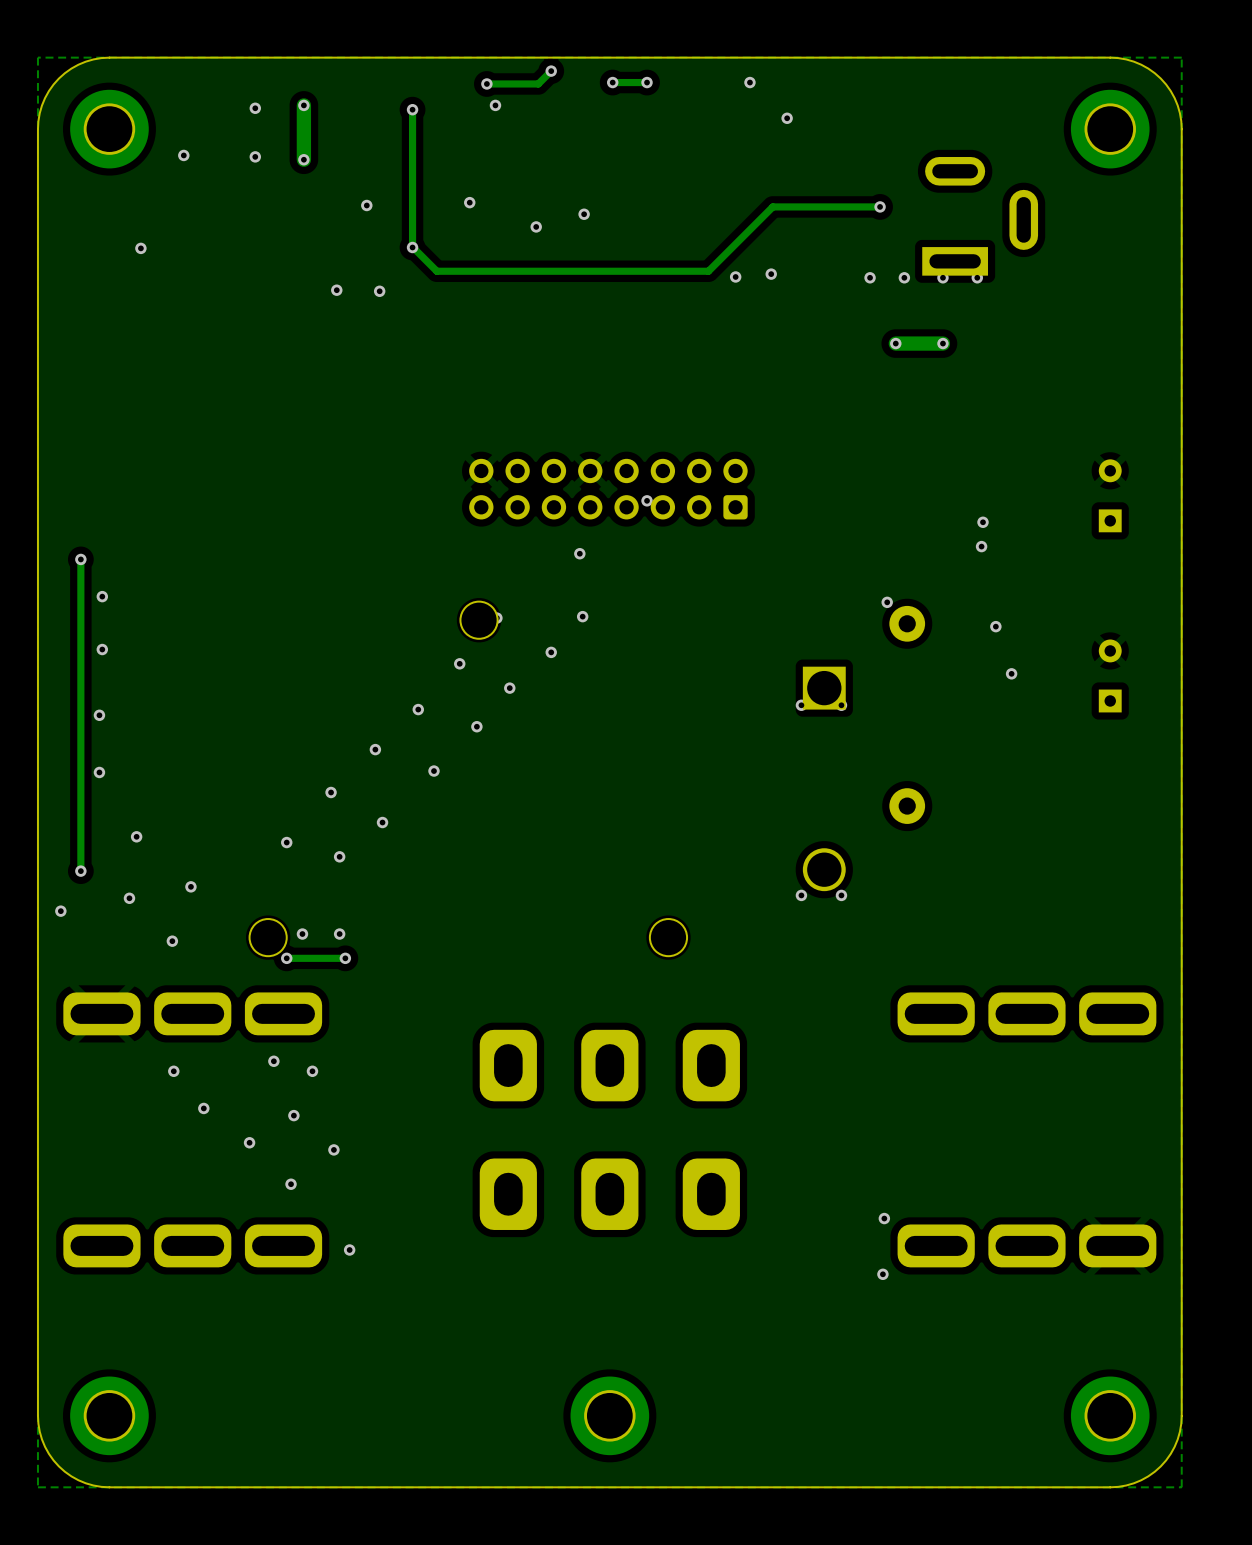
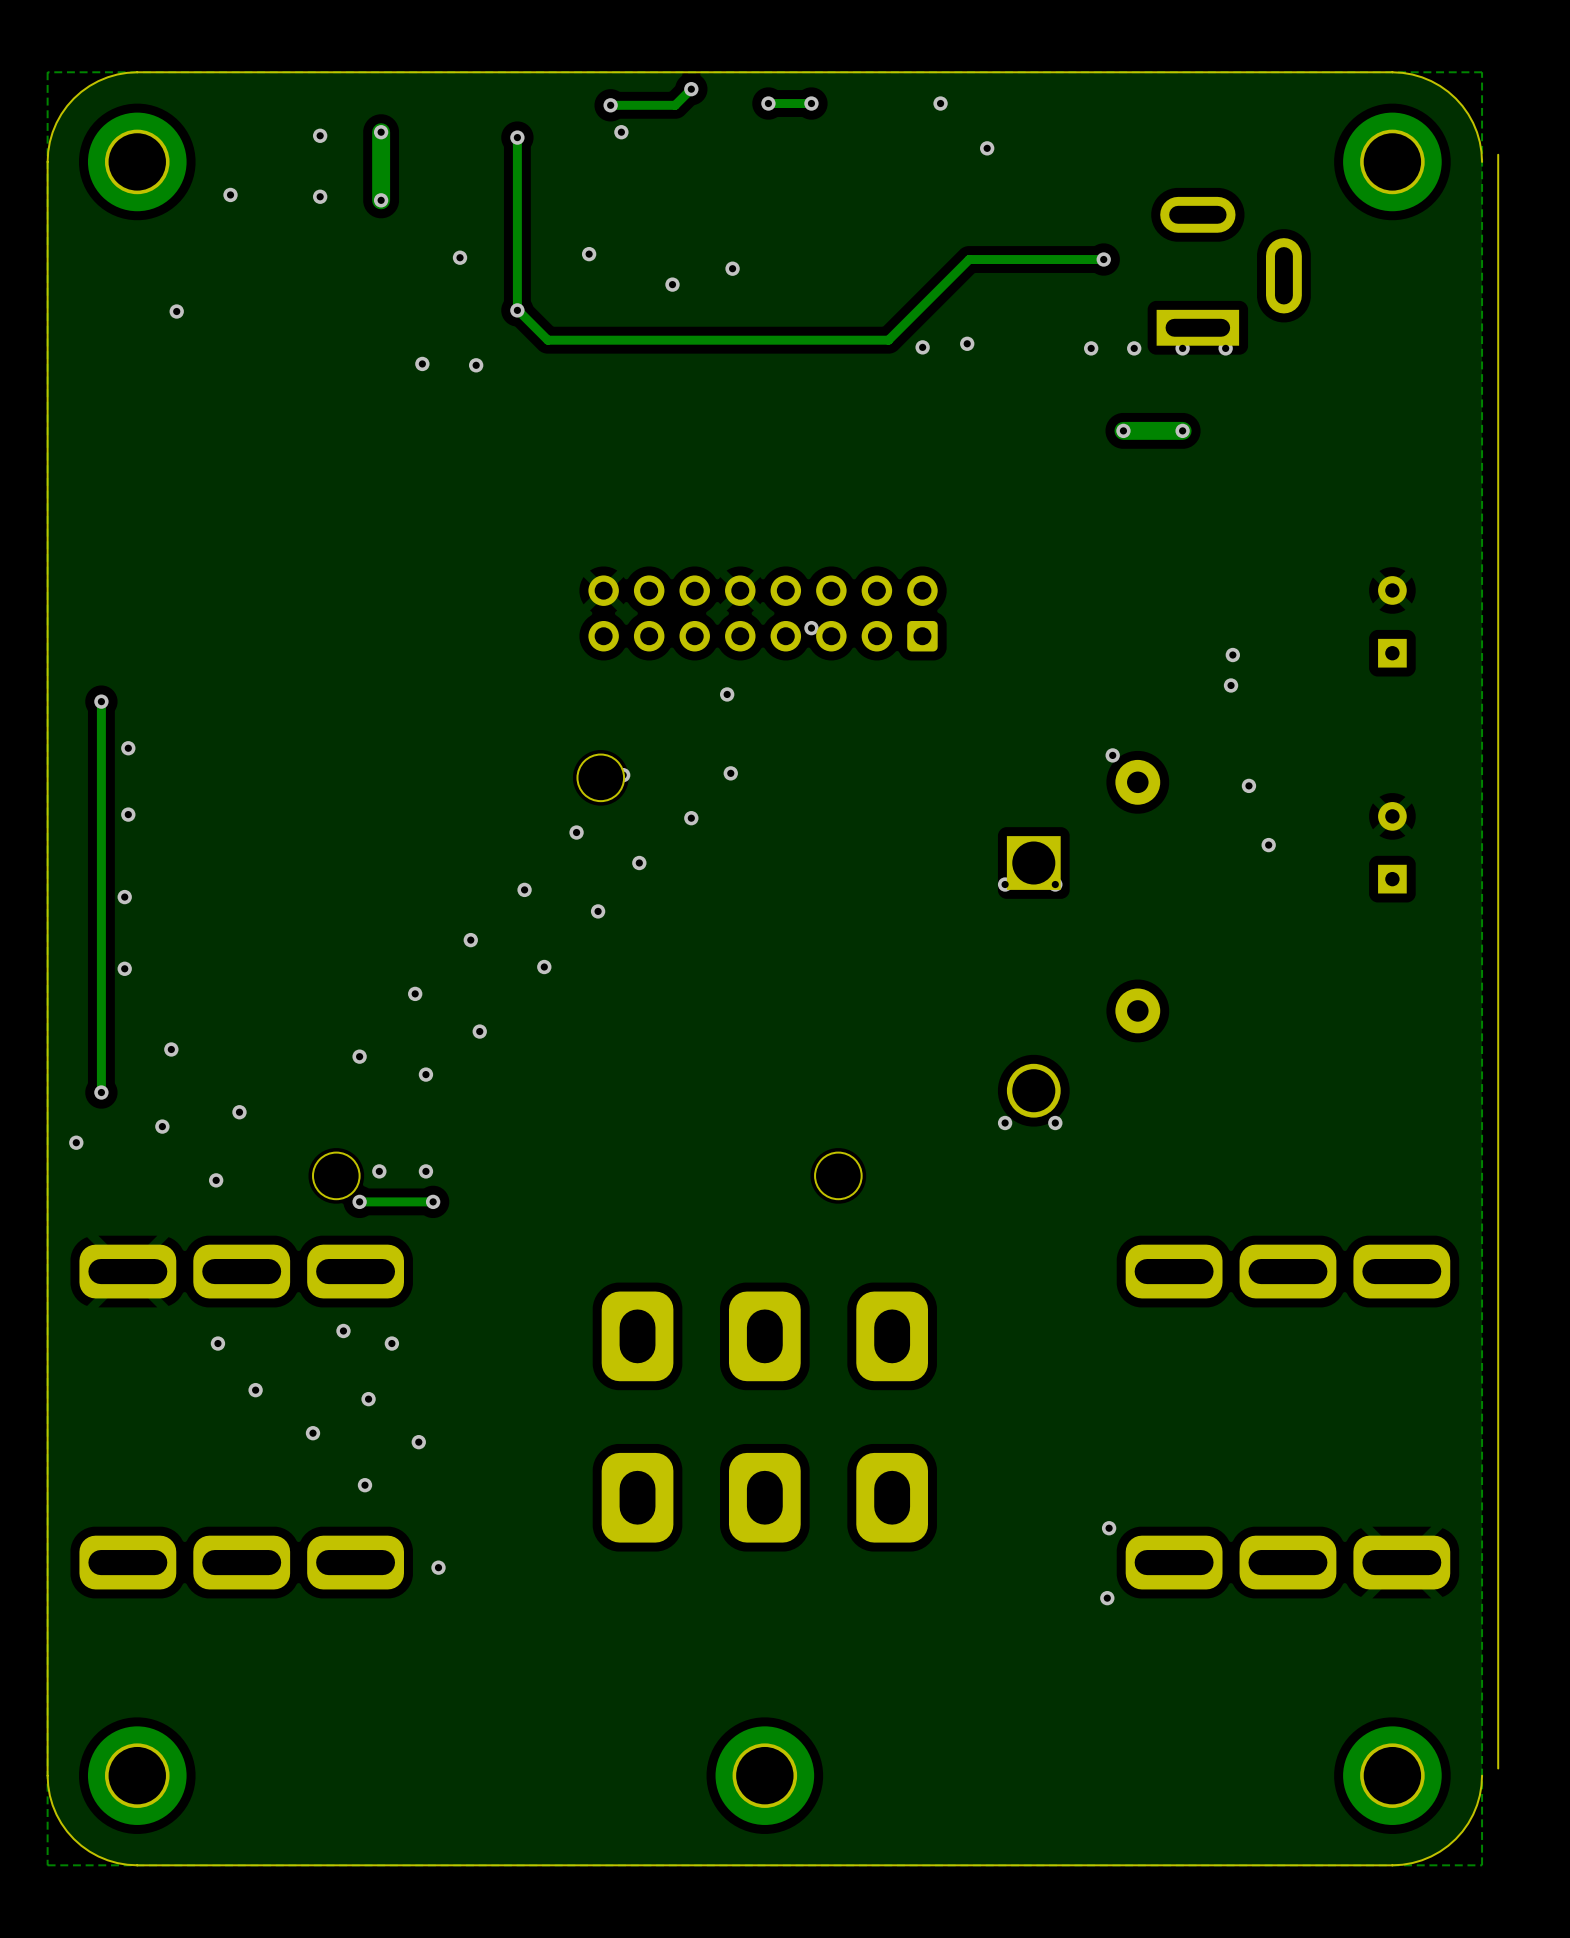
board edge: (1181, 129) (1181, 1415) -> (1498, 154) (1498, 1768)

